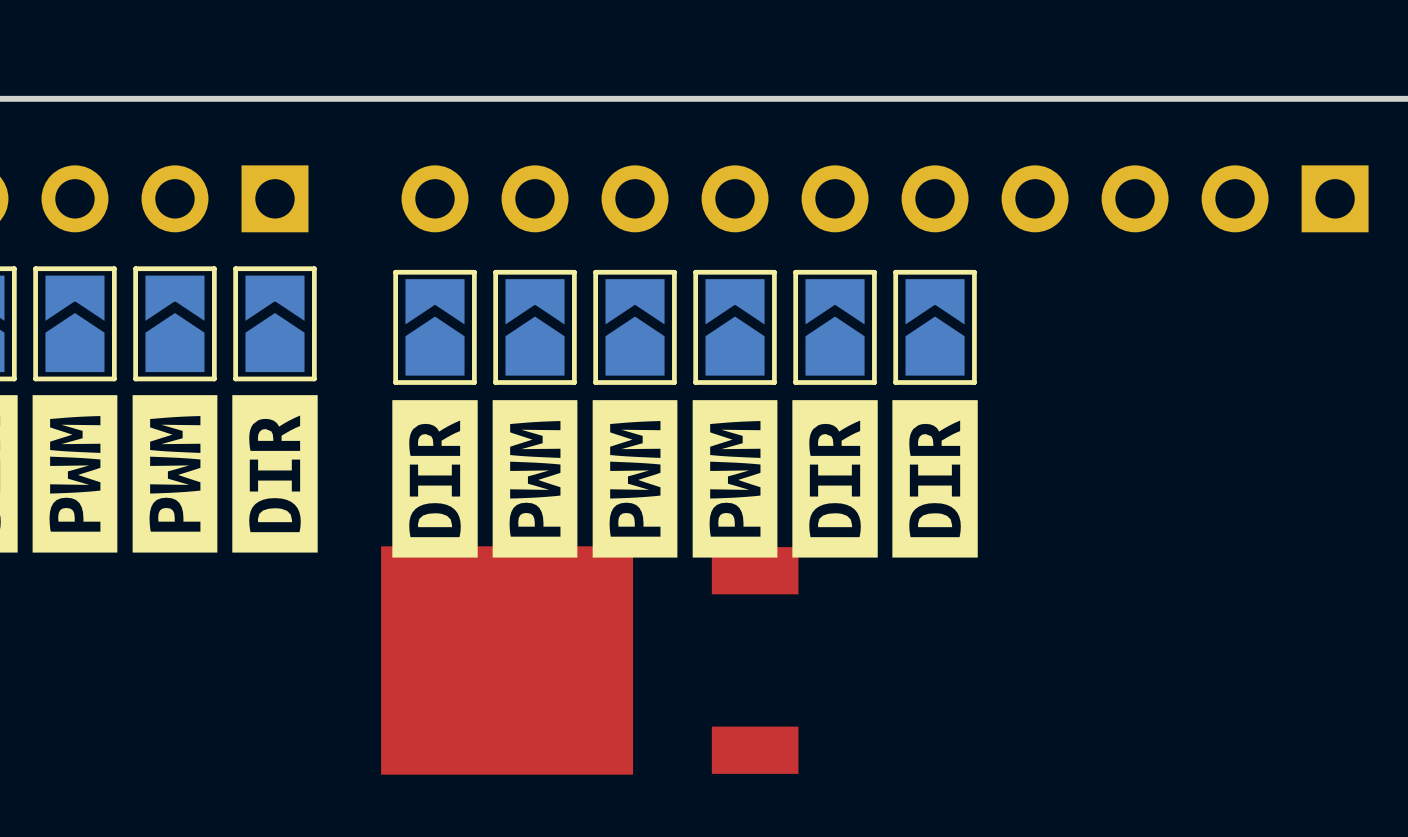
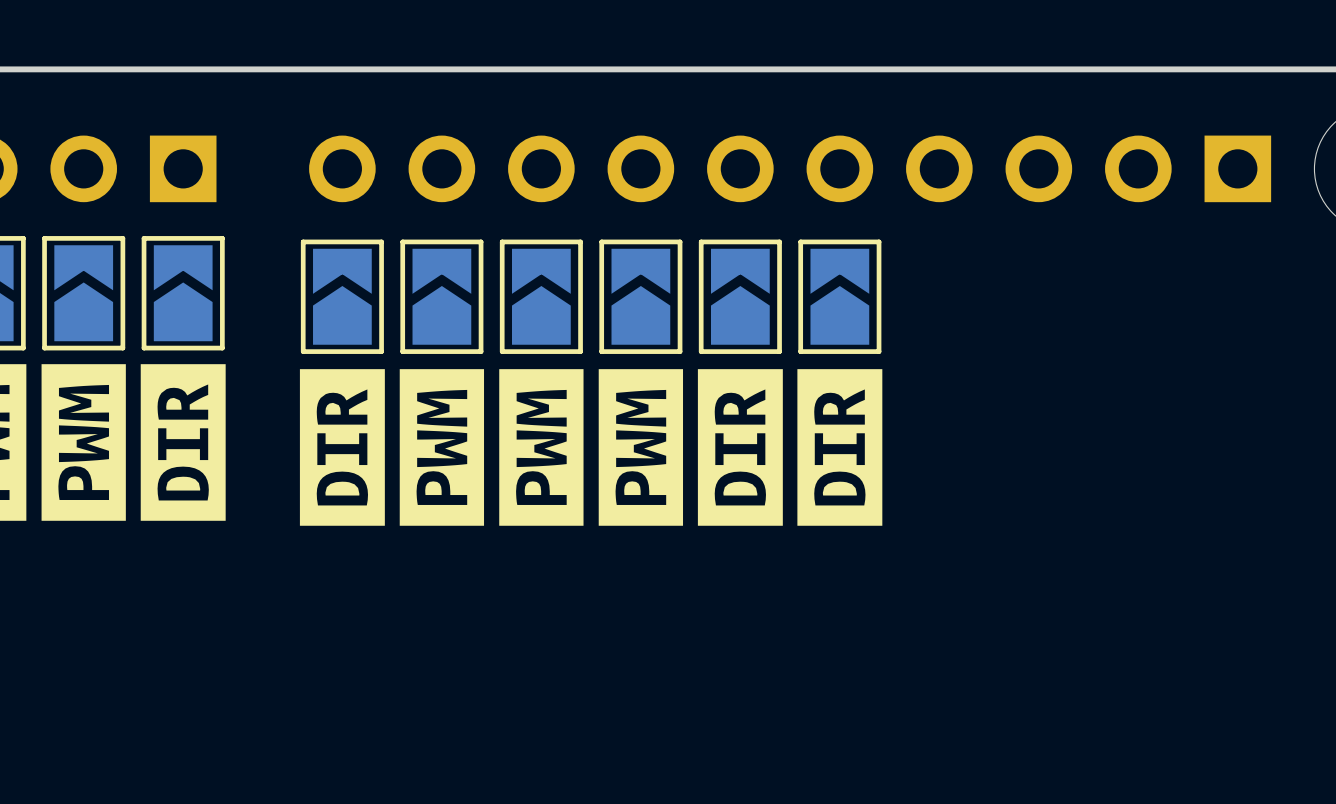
part: (589, 660) -> none

